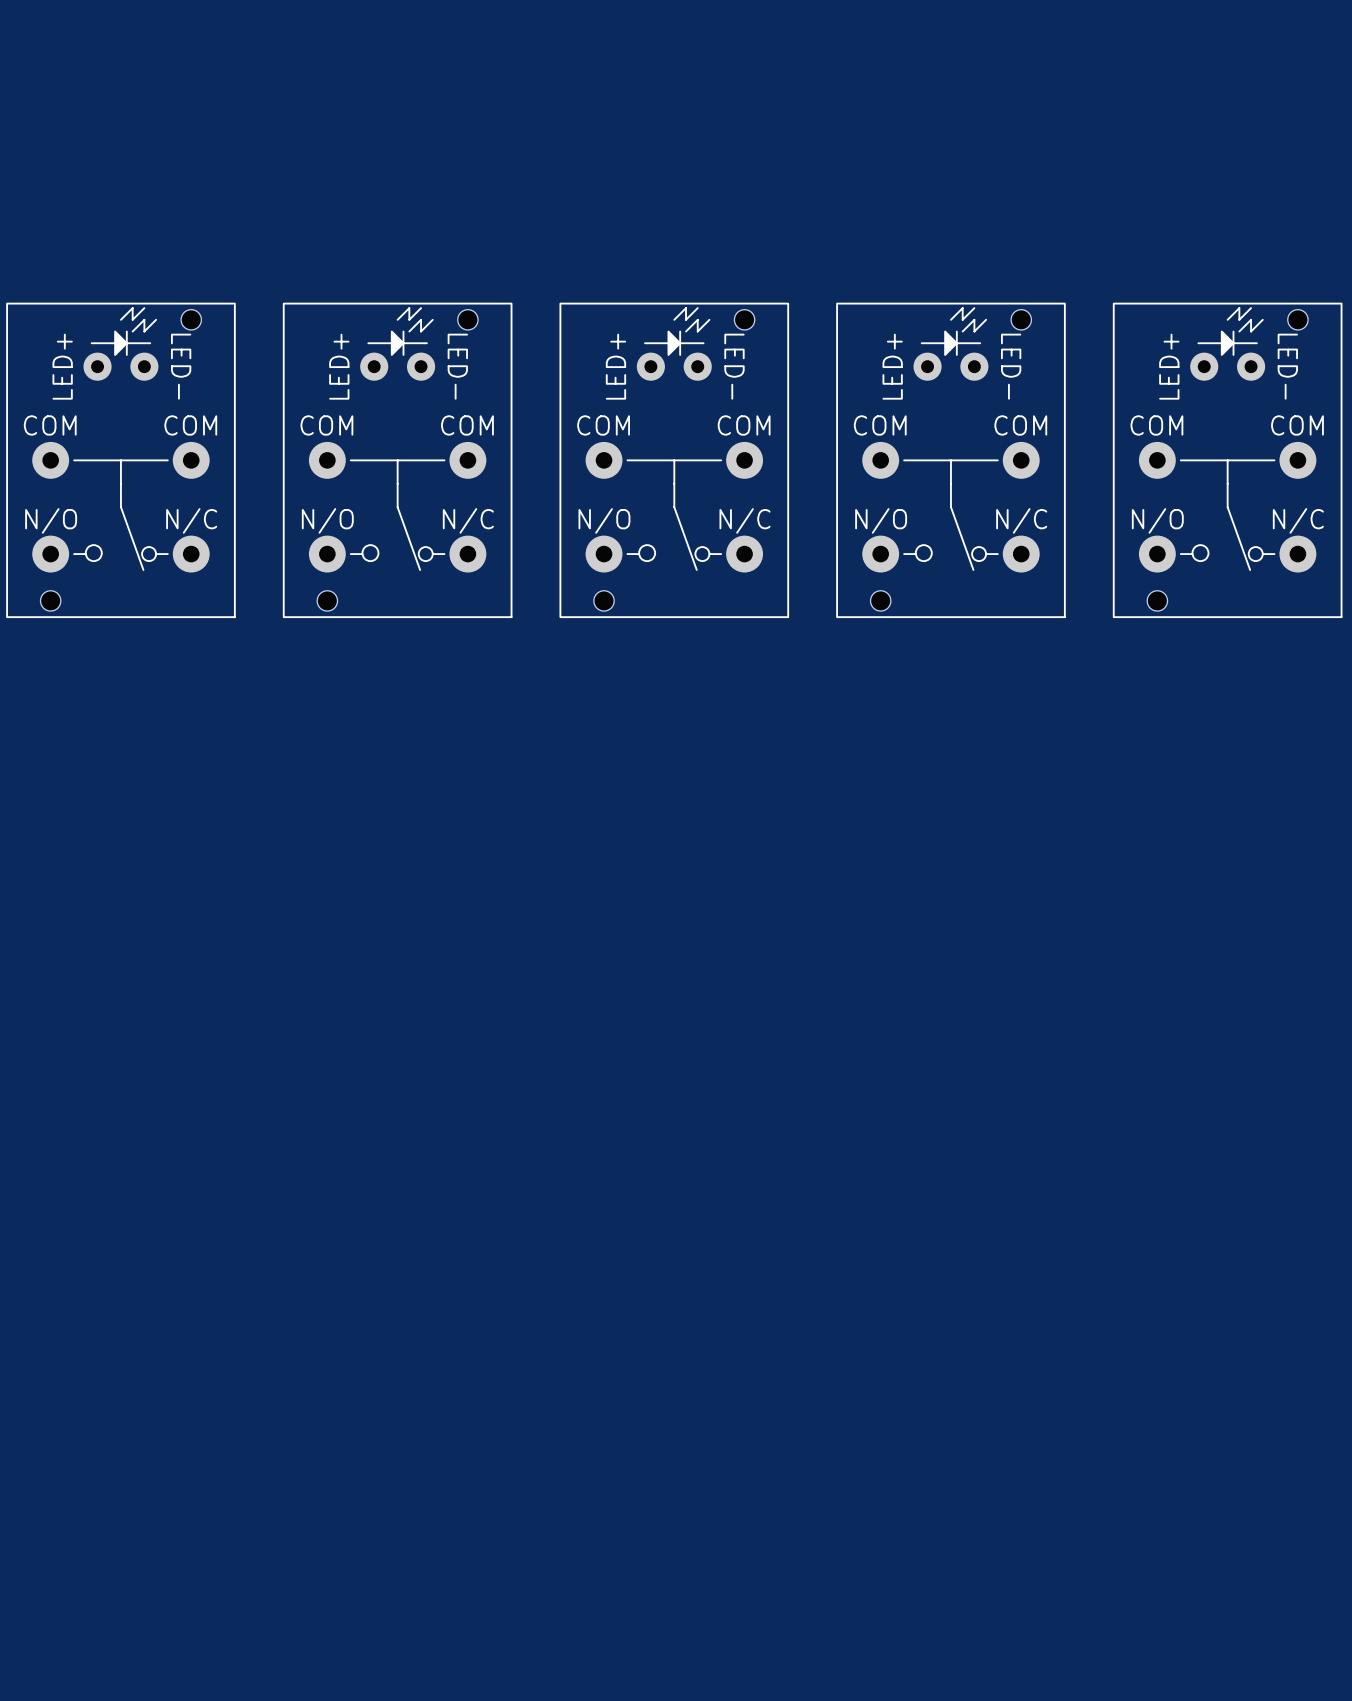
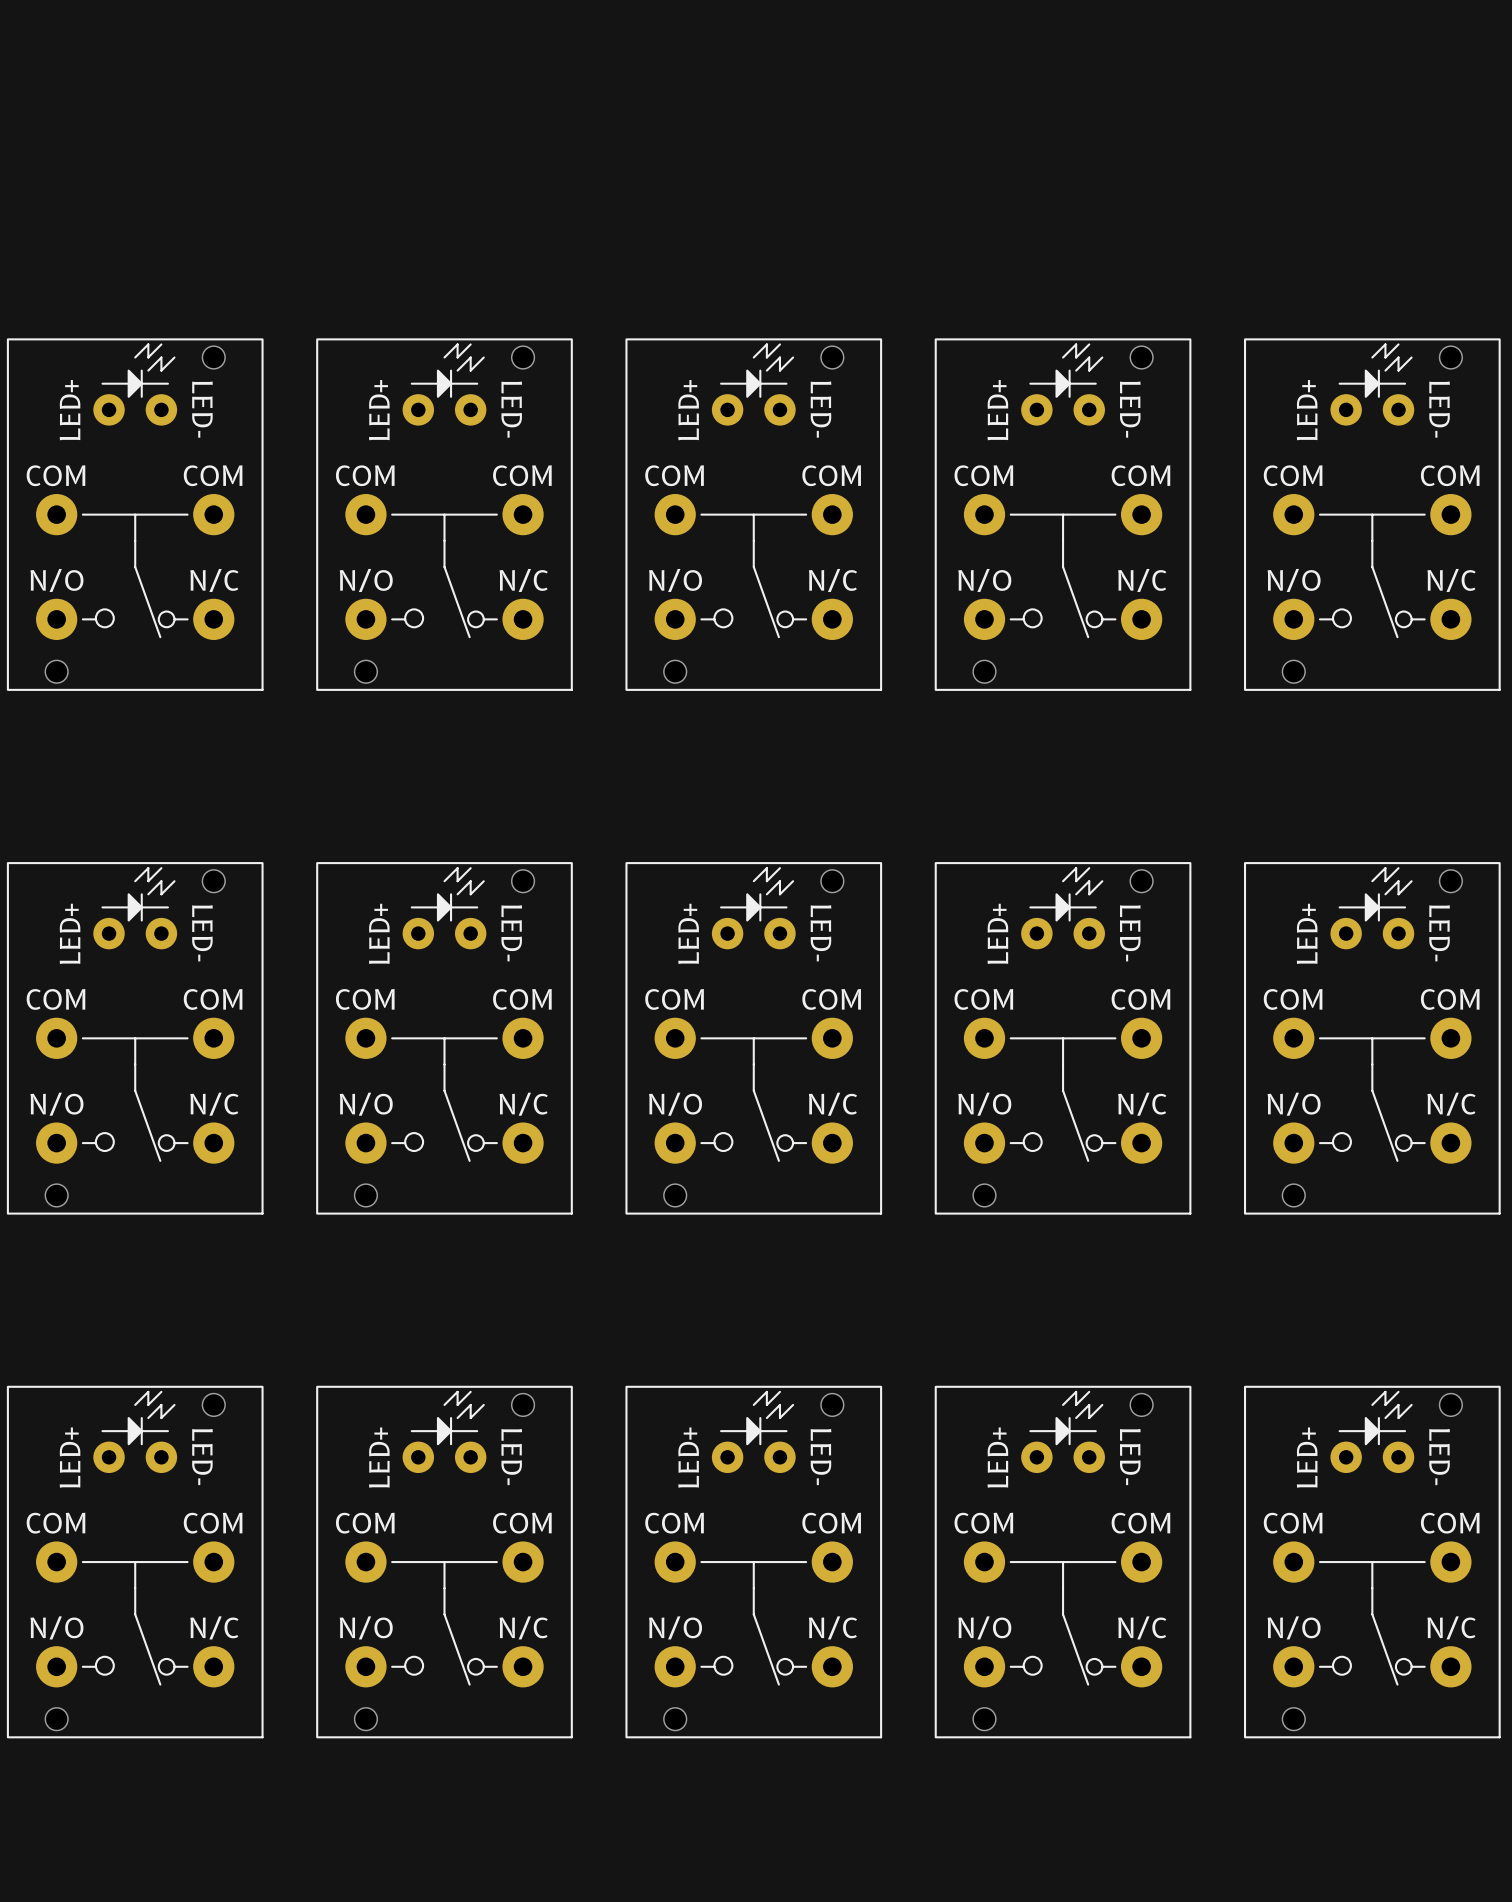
part: none -> (135, 1038)
part: none -> (444, 1038)
part: none -> (753, 1038)
part: none -> (1063, 1038)
part: none -> (1372, 1038)
part: none -> (135, 1562)
part: none -> (444, 1562)
part: none -> (753, 1562)
part: none -> (1063, 1562)
part: none -> (1372, 1562)

